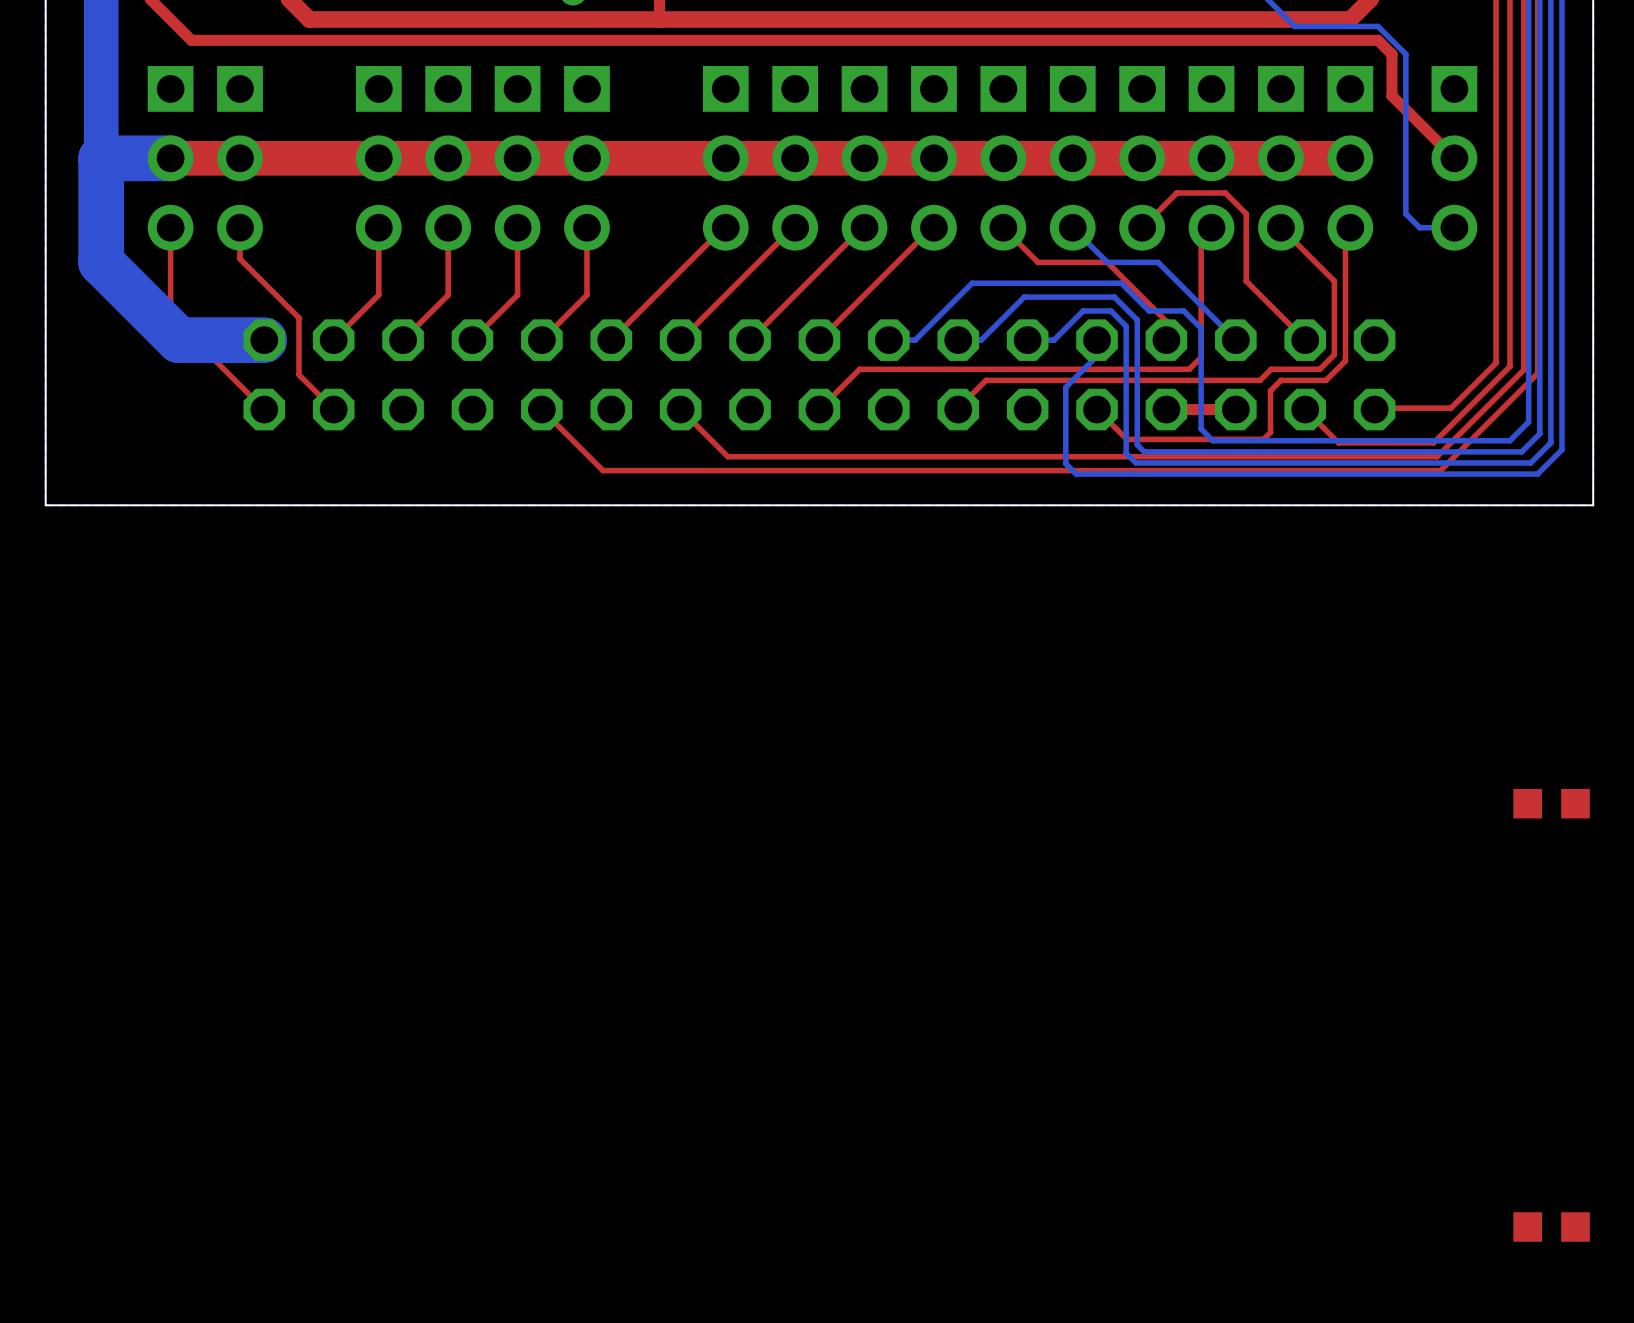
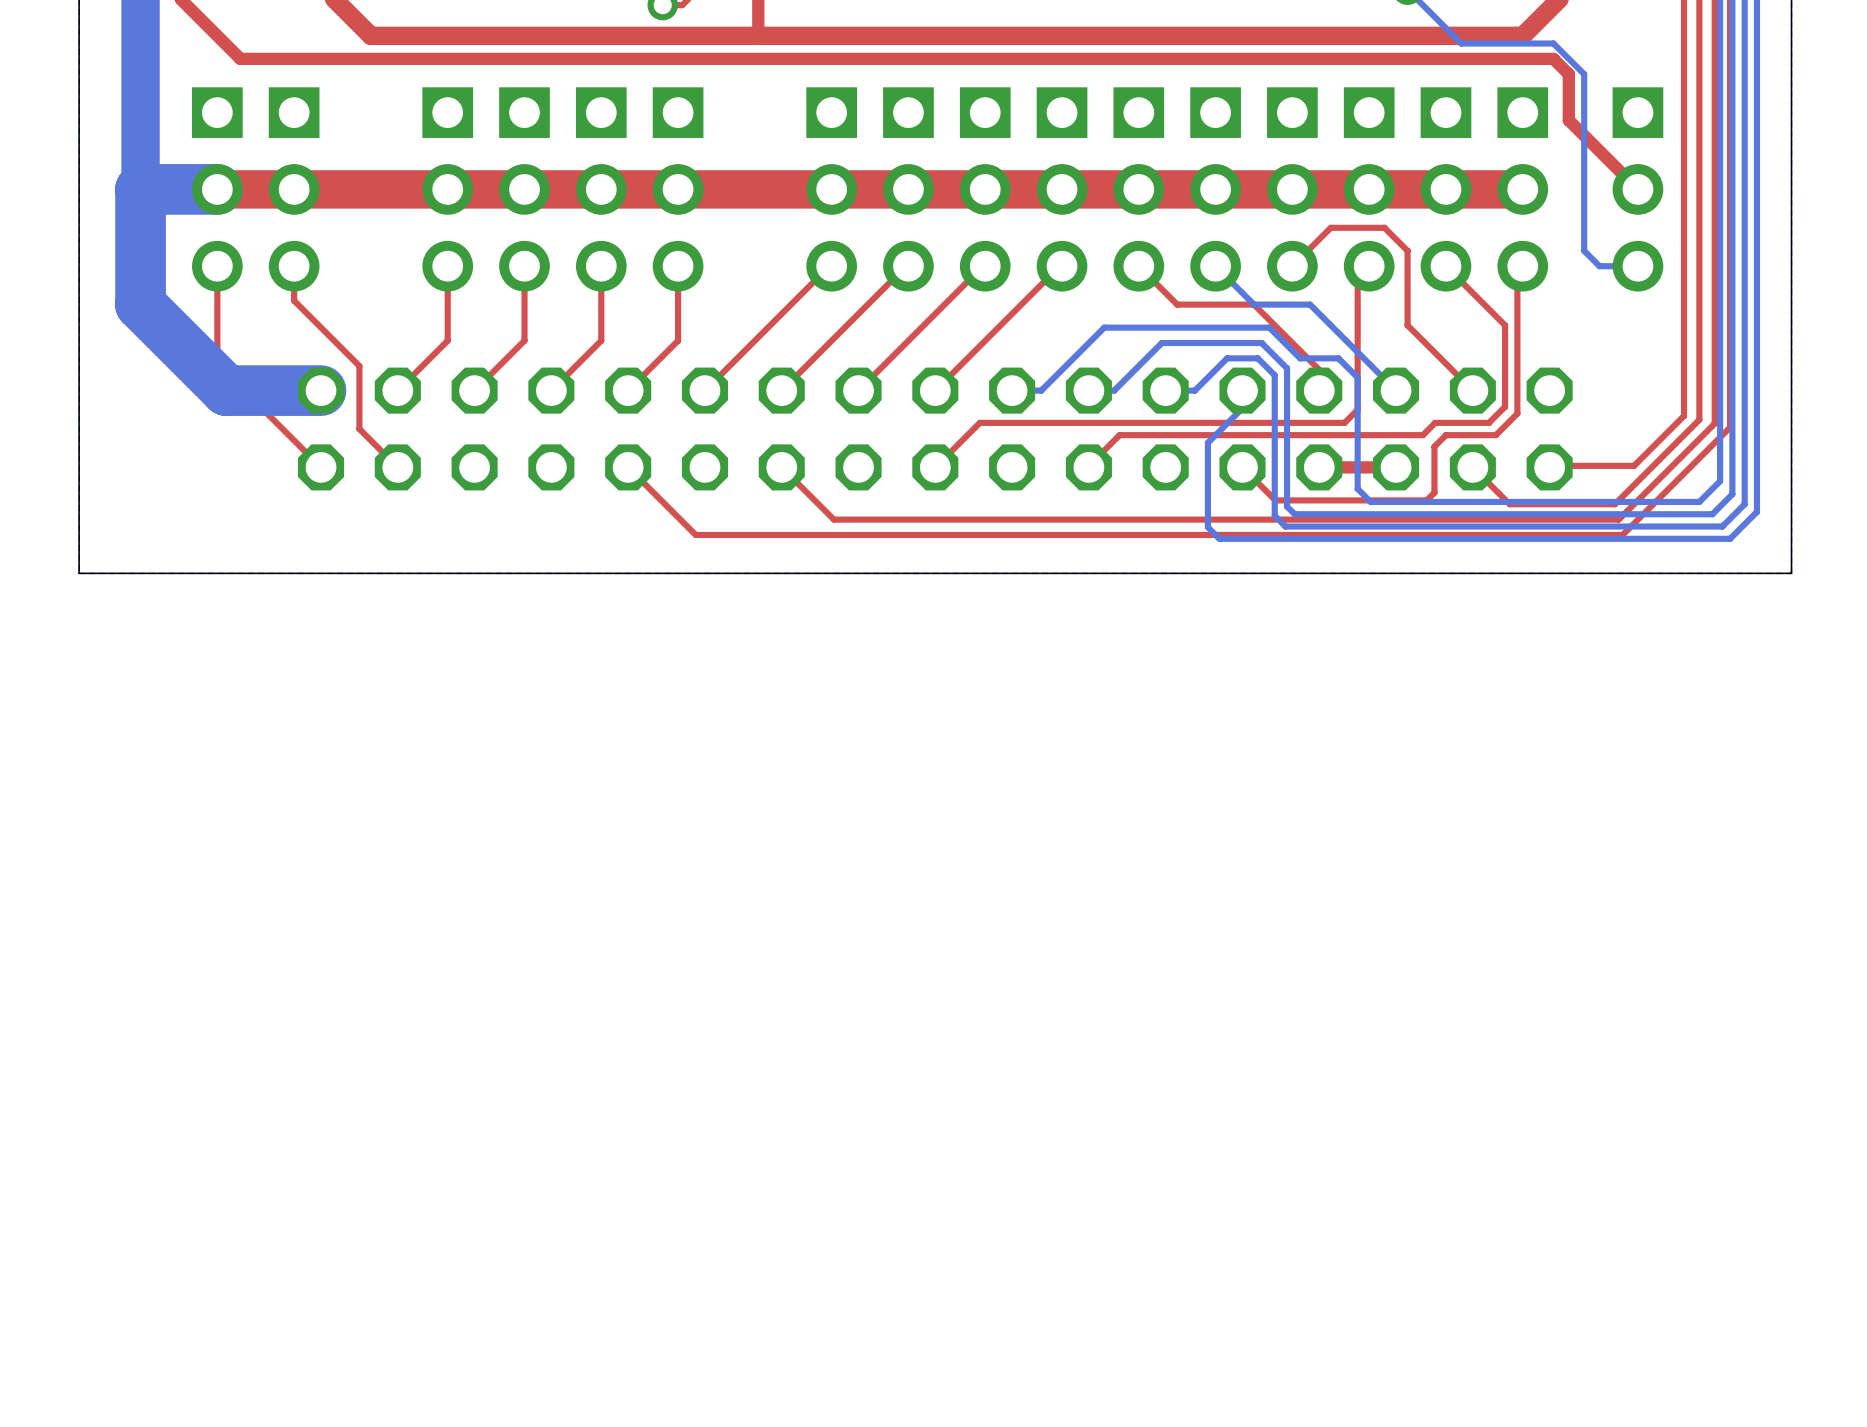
part: (1551, 803) -> none
part: (1551, 1227) -> none

